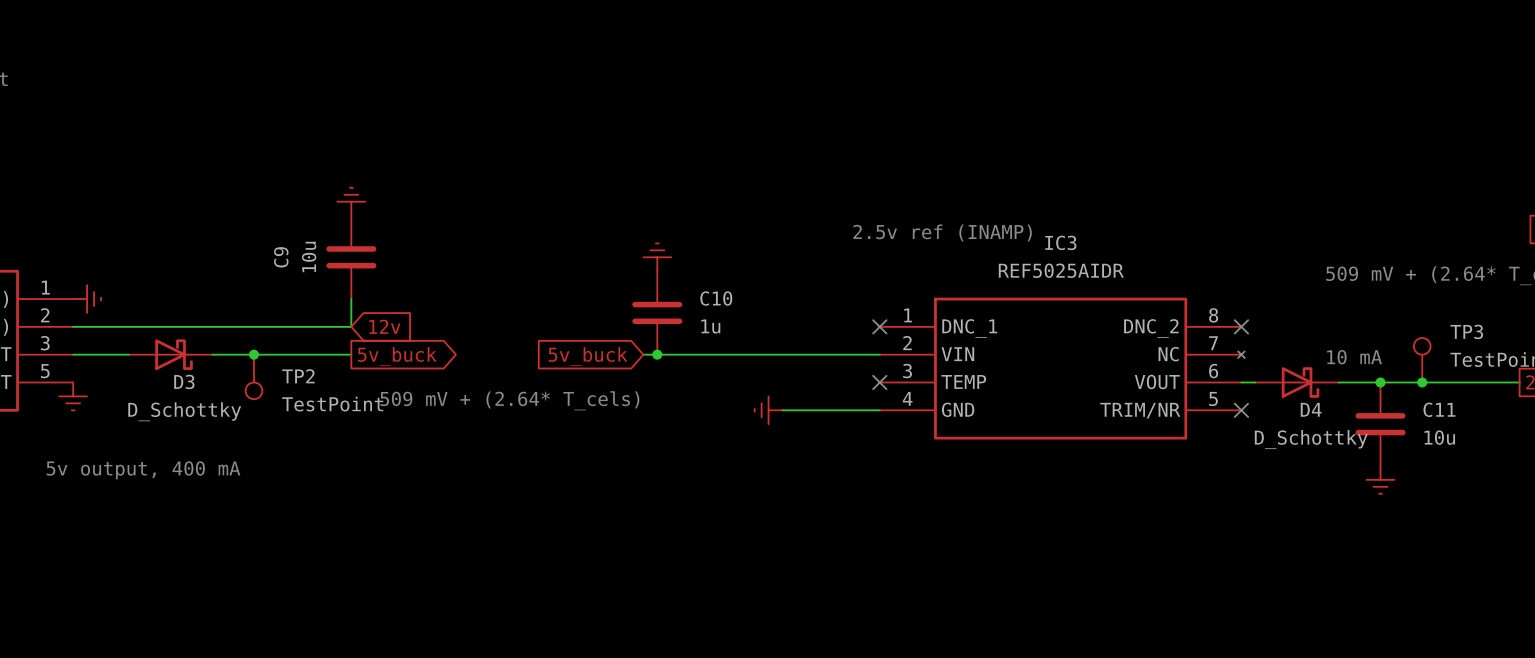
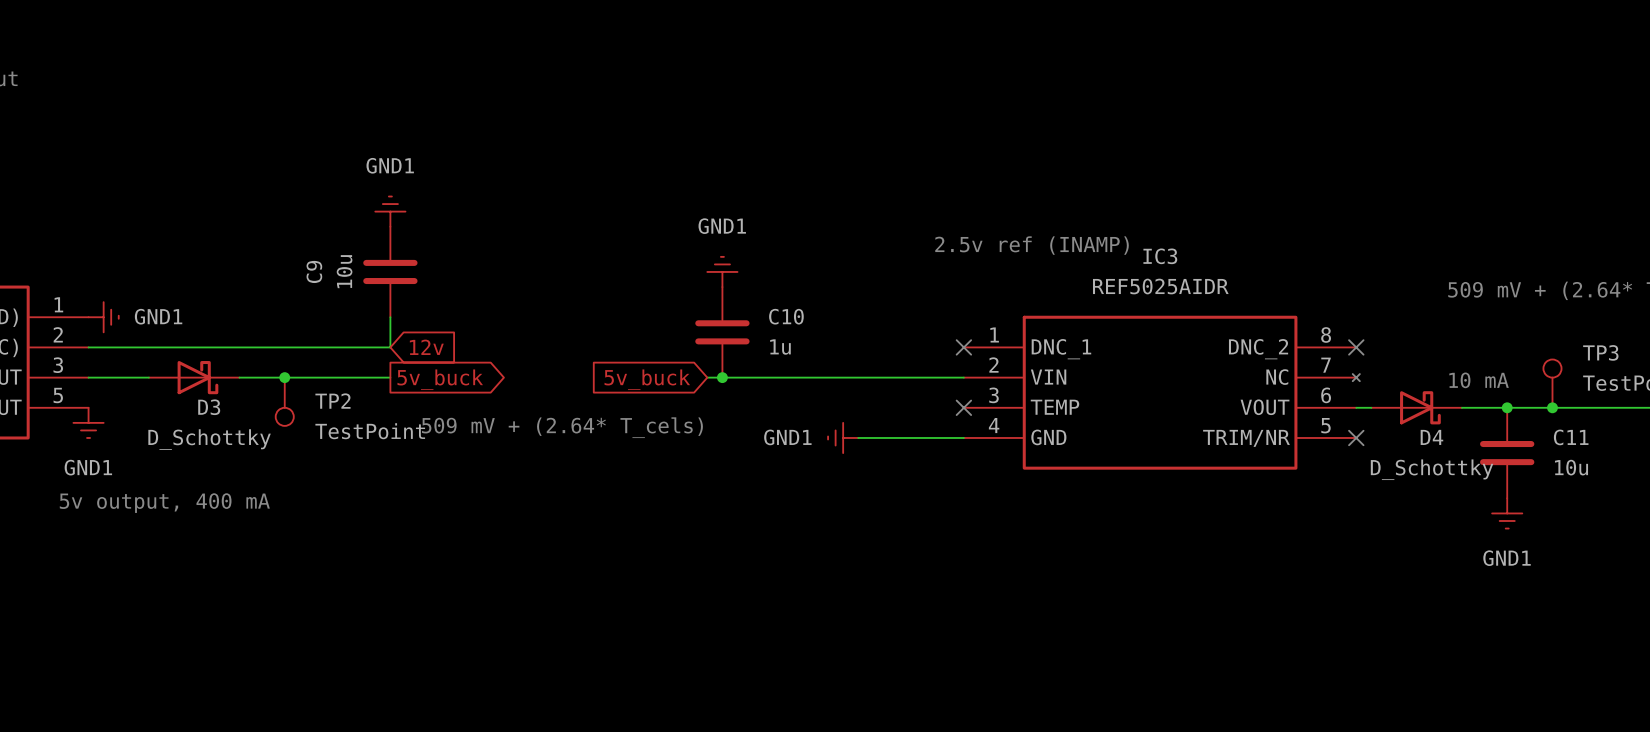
power symbol text: none -> GND1 (390, 165)
power symbol text: none -> GND1 (722, 226)
power symbol text: none -> GND1 (158, 316)
power symbol text: none -> GND1 (787, 437)
power symbol text: none -> GND1 (88, 467)
power symbol text: none -> GND1 (1507, 558)

